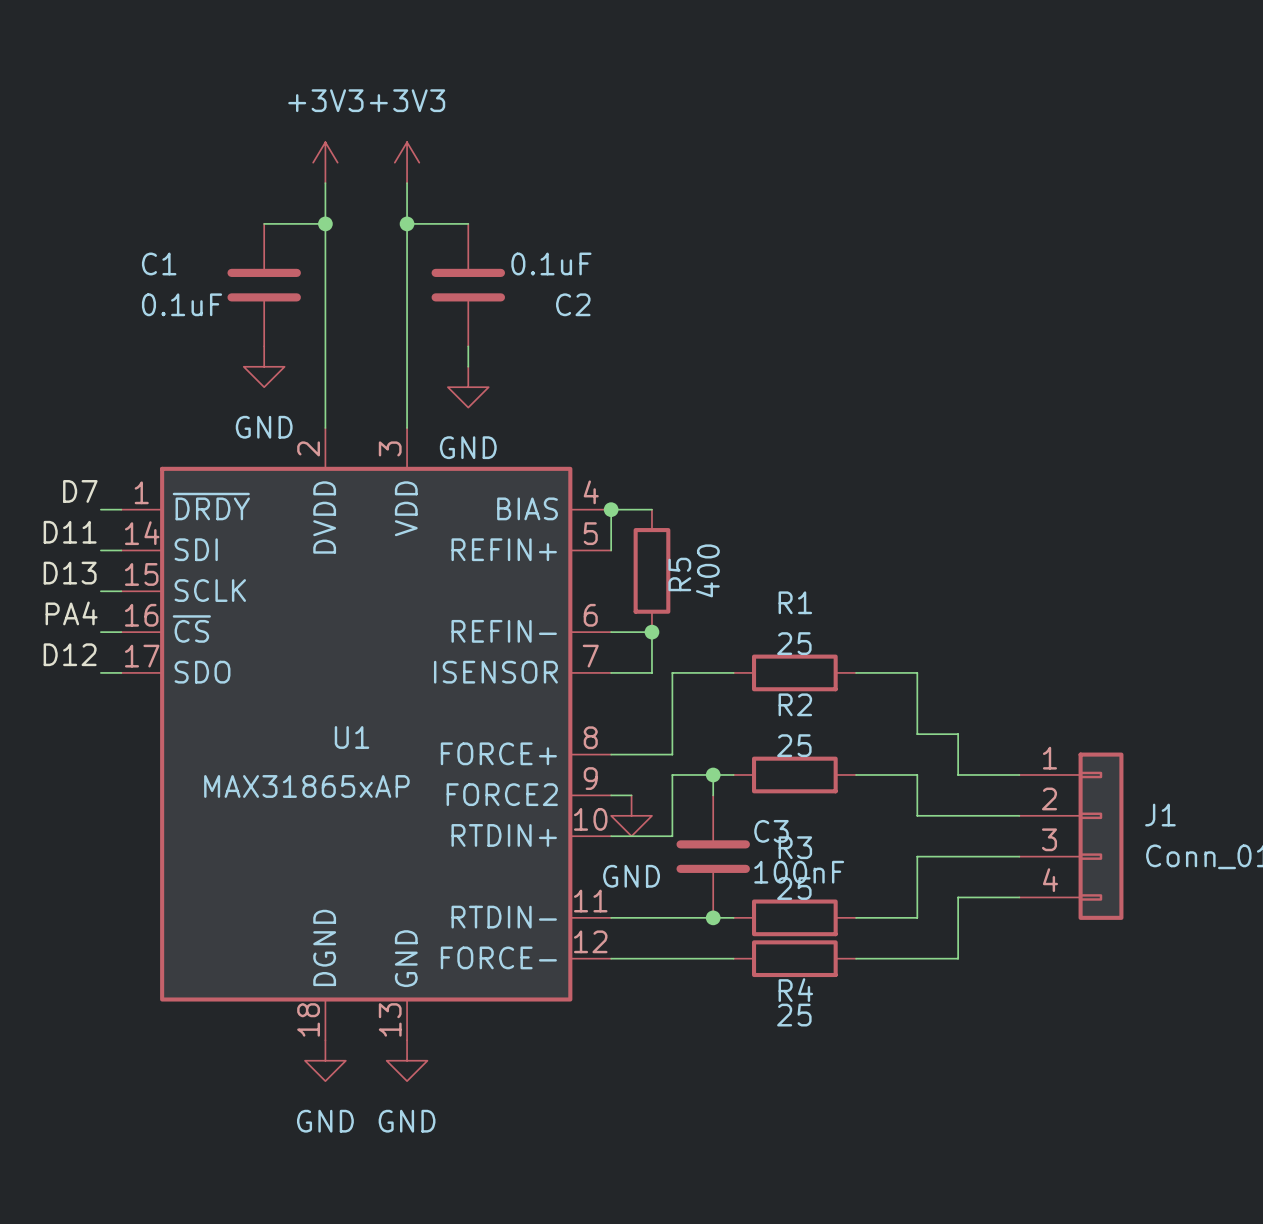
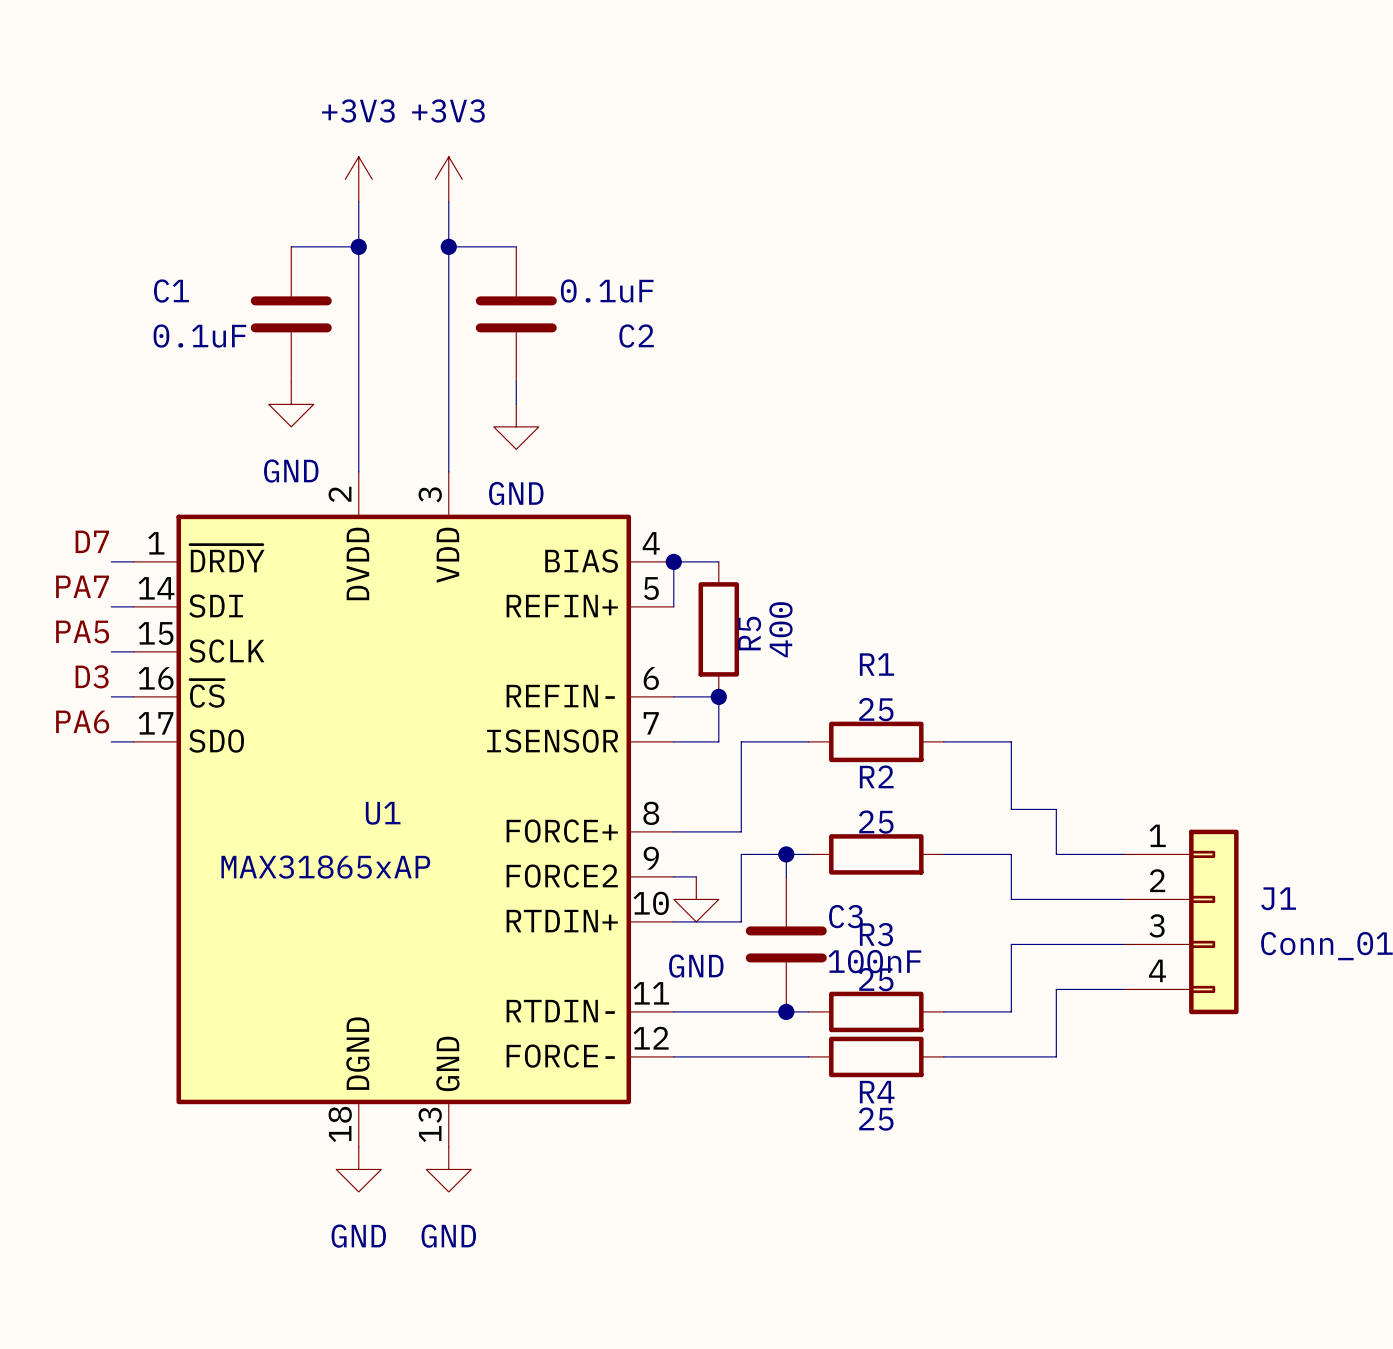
label: D11 (70, 532) -> PA7 (82, 586)
label: D13 (70, 573) -> PA5 (82, 632)
label: PA4 (71, 613) -> D3 (92, 676)
label: D12 (70, 654) -> PA6 (82, 722)

